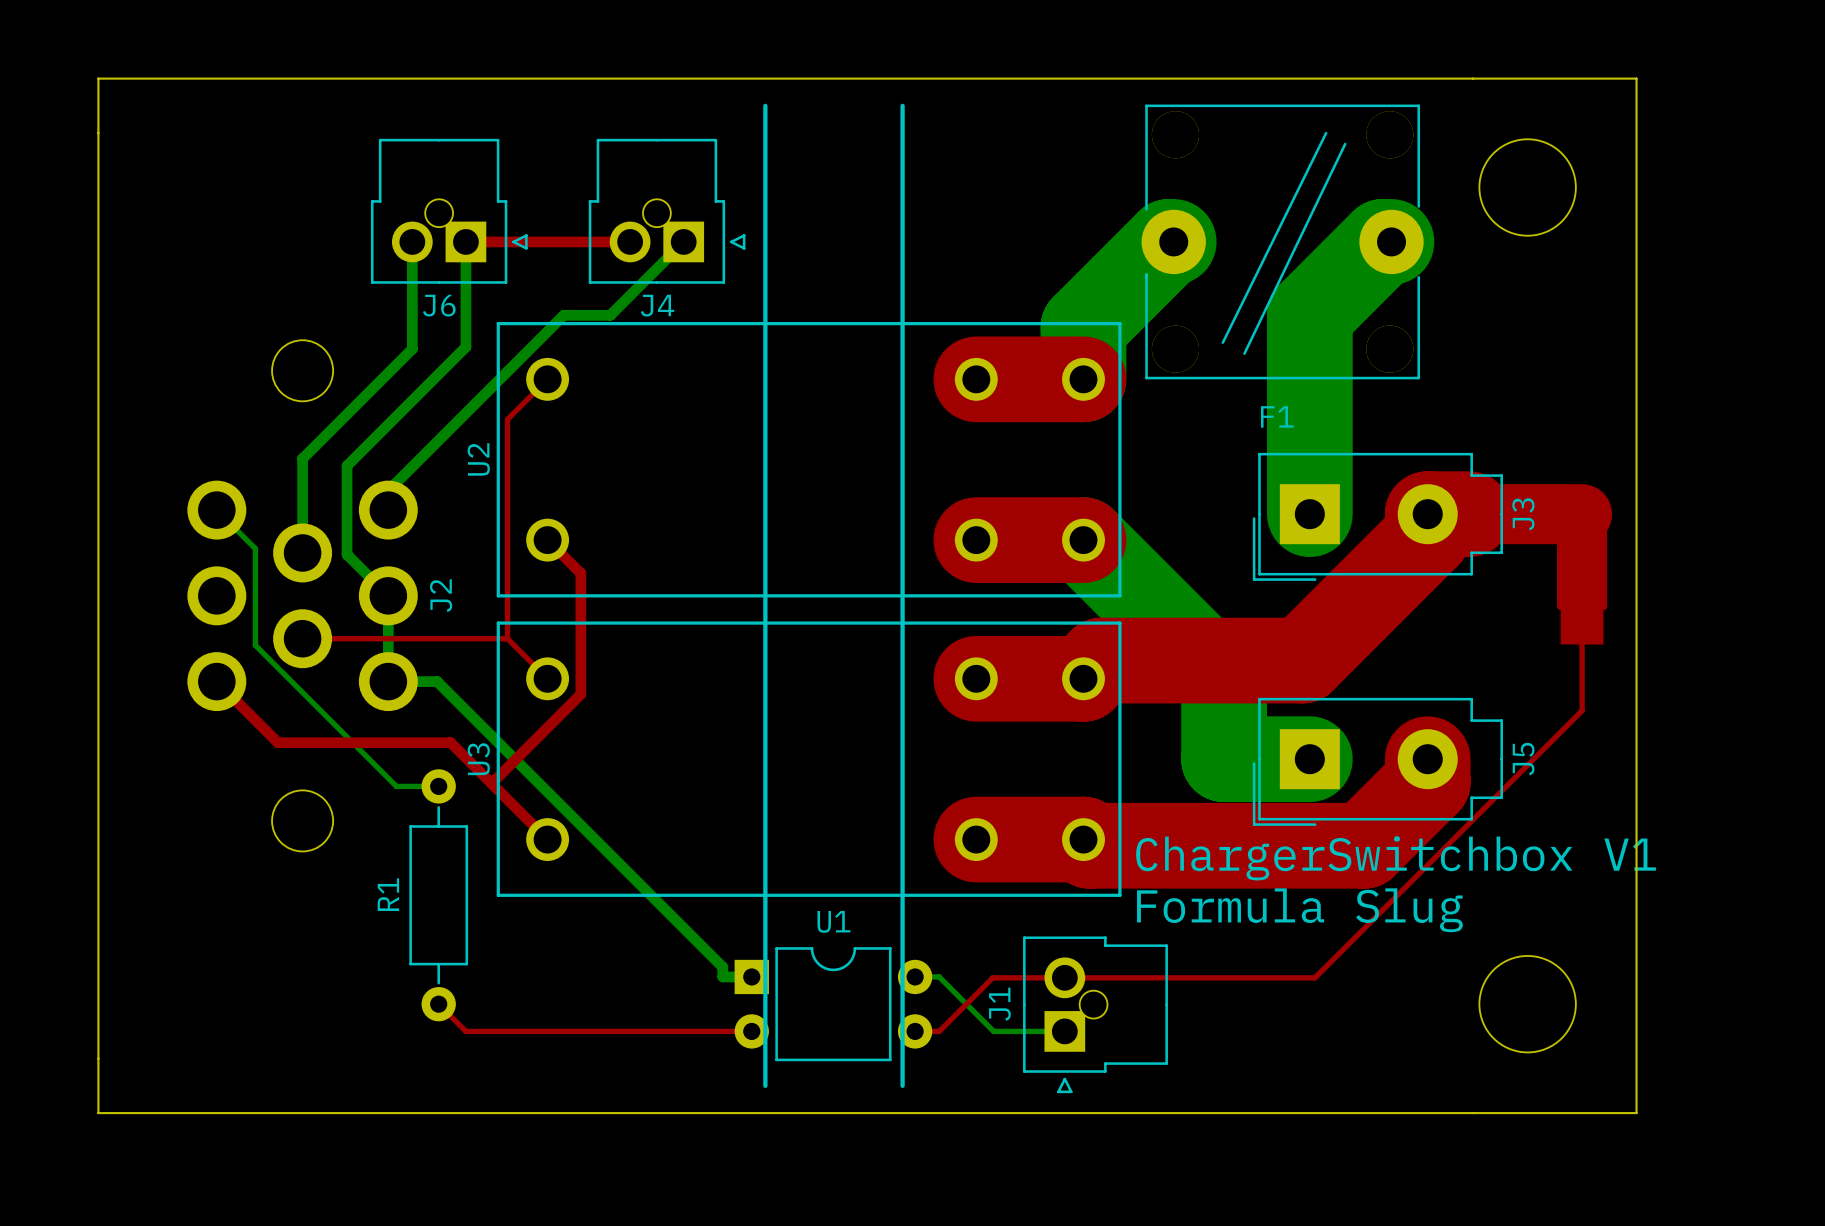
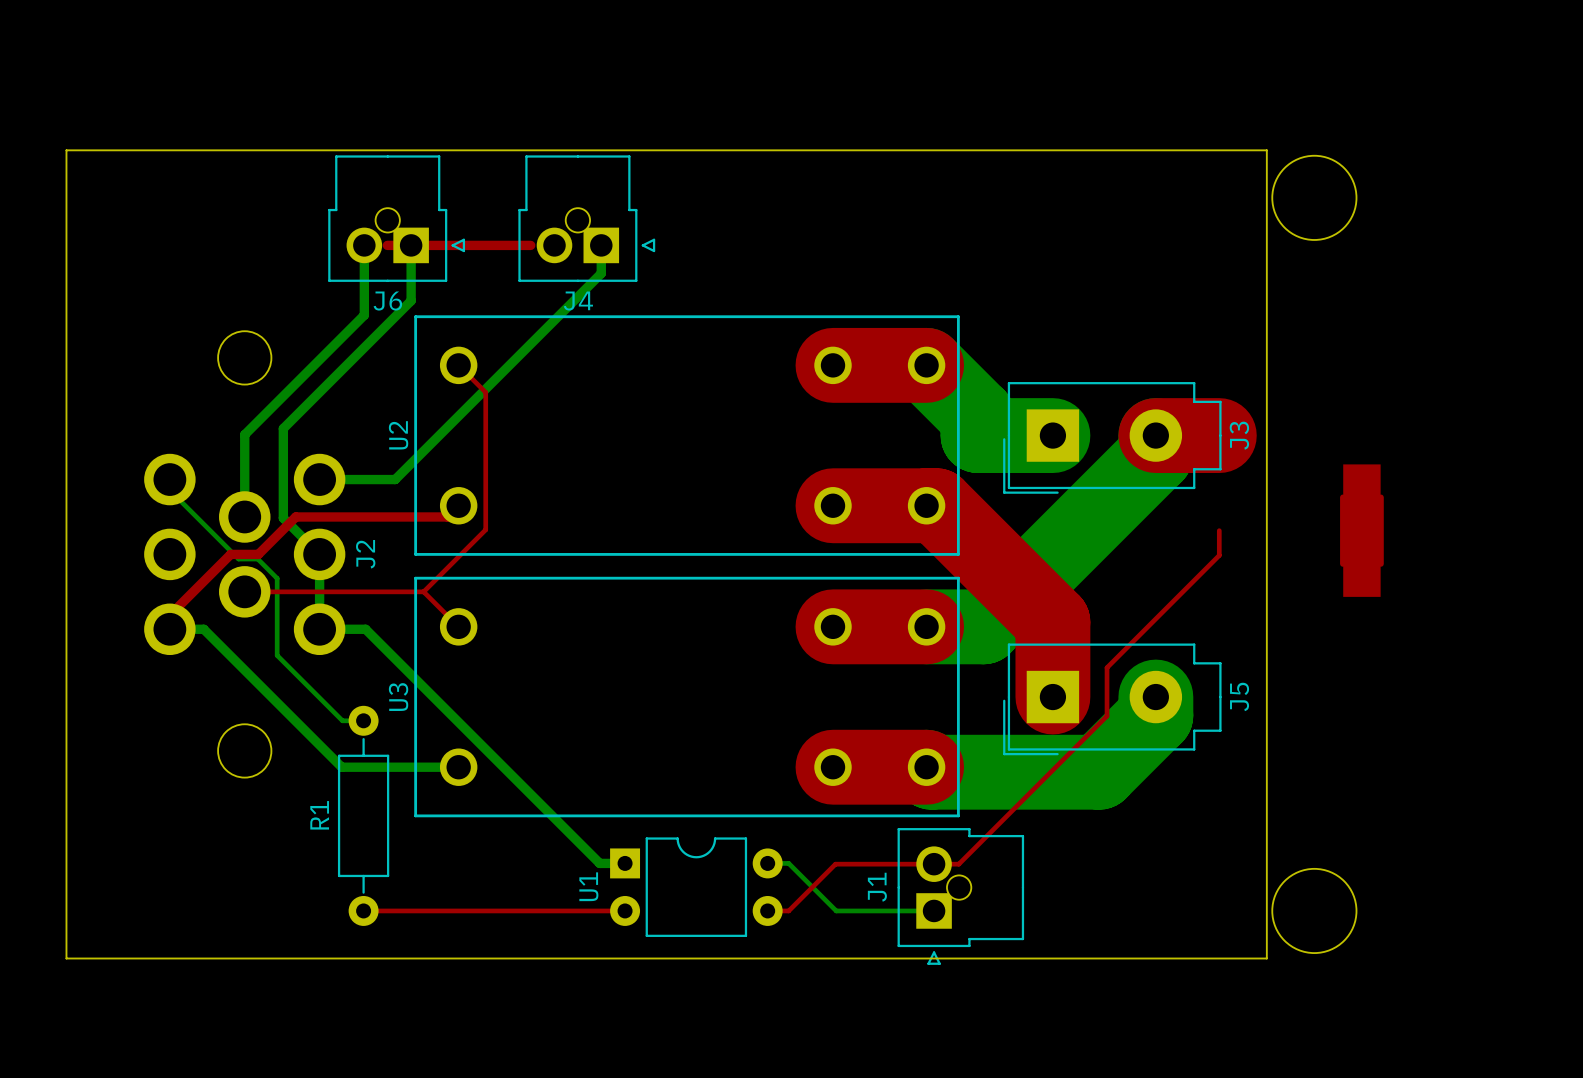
line: (765, 105) (765, 1085) -> none
line: (902, 105) (902, 1085) -> none
board edge: (98, 133) (98, 78) (1636, 78) (1636, 1113) (98, 1113) (98, 1058) -> (66, 150) (1266, 150) (1266, 958) (66, 958)
J6 position: (449, 211) -> (396, 218)
J4 position: (667, 211) -> (586, 218)
bottom track: (412, 241) (412, 349) -> (364, 245) (364, 315) (340, 338)
bottom track: (465, 241) (465, 346) (347, 465) (347, 554) -> (411, 245) (411, 300) (283, 428) (283, 518)
bottom track: (683, 241) (610, 315) (563, 315) (388, 490) (388, 510) -> (601, 245) (601, 273) (395, 479) (319, 479)
bottom track: (1173, 241) (1168, 241) (1083, 327) (1083, 379) -> (1052, 435) (978, 435) (978, 416) (926, 365)
F1: (1282, 241) -> none
bottom track: (1391, 241) (1382, 241) (1309, 315) (1309, 514) -> none
top track: (547, 379) (507, 419) (507, 638) -> (458, 365) (485, 392) (485, 529) (423, 591)
bottom track: none -> (1155, 435) (1155, 454) (983, 626) (926, 626)
top track: none -> (1155, 435) (1219, 435)
bottom track: (216, 510) (255, 548) (255, 645) (396, 786) (414, 786) -> (169, 479) (169, 490) (238, 559) (257, 559) (277, 578) (277, 655) (342, 720)
top track: (1582, 514) (1427, 514) (1427, 535) (1302, 660) (1101, 660) (1083, 678) -> none
J3 position: (1377, 516) -> (1112, 437)
top track: (547, 540) (580, 573) (580, 694) (491, 783) -> (458, 505) (447, 516) (295, 516) (258, 554) (230, 554) (169, 615) (169, 629)
bottom track: (1083, 540) (1224, 680) (1224, 759) (1309, 759) -> none
top track: none -> (926, 505) (936, 505) (1052, 622) (1052, 697)
top track: none -> (1219, 530) (1219, 555) (1107, 667) (1107, 716) (958, 864) (835, 864) (788, 910) (767, 910)
top track: (1582, 623) (1582, 710) (1314, 977) (992, 977) (939, 1031) (915, 1031) -> none
bottom track: none -> (169, 629) (203, 629) (341, 767) (458, 767)
top track: (216, 681) (277, 742) (450, 742) (547, 839) -> none
bottom track: (437, 681) (722, 967) (722, 976) (751, 976) -> (362, 629) (365, 629) (599, 863) (625, 863)
bottom track: none -> (1155, 697) (1155, 715) (1099, 772) (931, 772) (926, 767)
top track: (1427, 759) (1427, 782) (1364, 845) (1089, 845) (1083, 839) -> none
J5 position: (1377, 761) -> (1112, 699)
text: ChargerSwitchbox V1 (1396, 858) -> none
text: Formula Slug (1299, 910) -> none
U1 name rotation: 0° (833, 921) -> 90° counterclockwise (588, 886)
U1 name position: U1 (833, 921) -> U1 (588, 886)
bottom track: none -> (767, 863) (788, 863) (836, 910) (934, 910)
bottom track: (915, 976) (939, 976) (993, 1031) (1064, 1031) -> none
top track: (438, 1004) (465, 1031) (751, 1031) -> (363, 910) (625, 910)
U1 position: (833, 1004) -> (696, 887)
J1 position: (1095, 1014) -> (960, 896)

